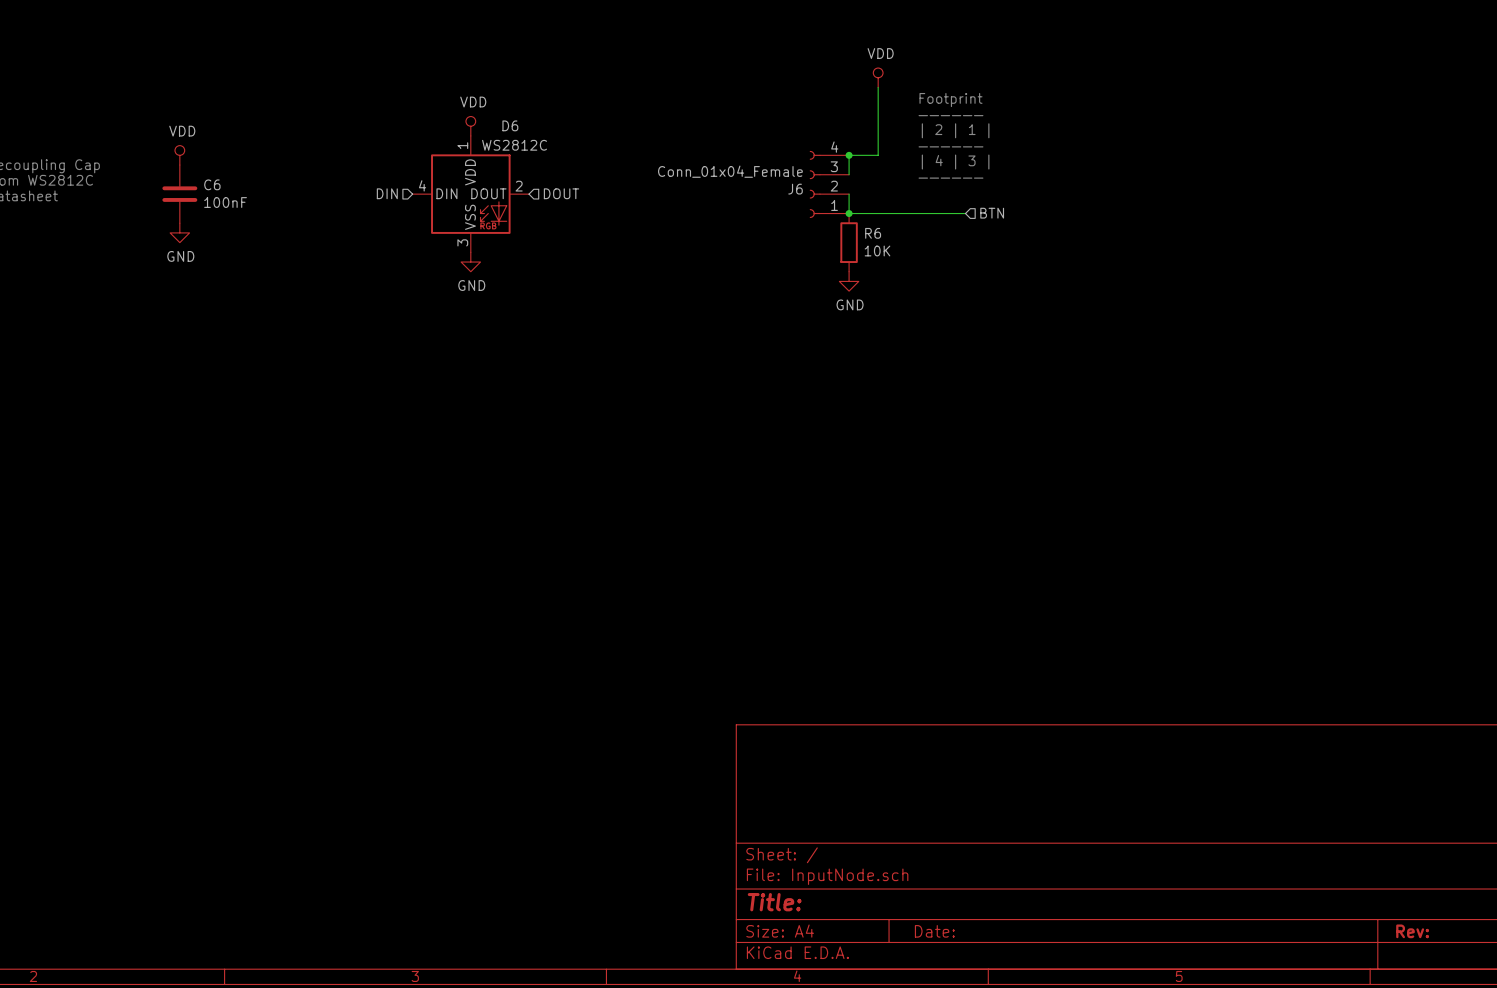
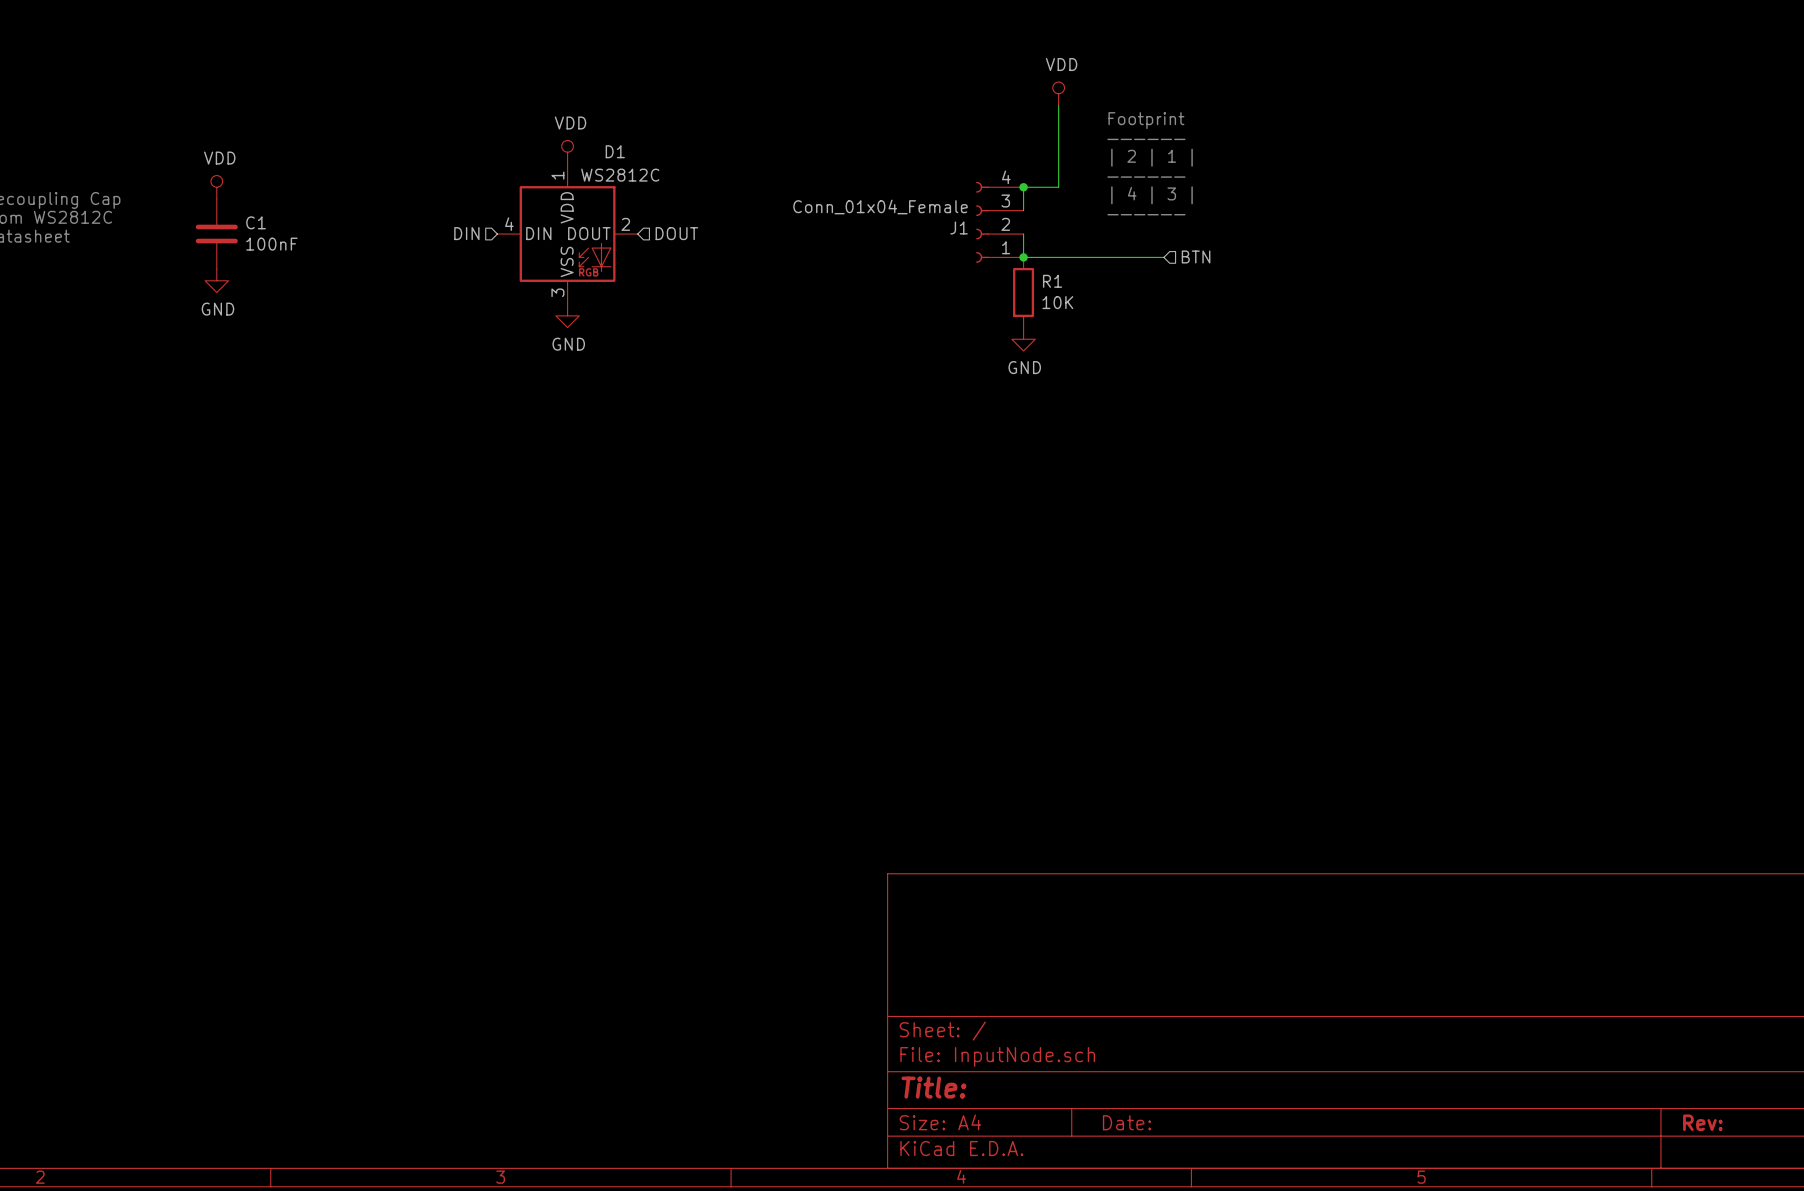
D6 name: D6 (510, 125) -> D1 (615, 151)
C6 name: C6 (212, 184) -> C1 (256, 222)
J6 name: J6 (795, 189) -> J1 (959, 227)
R6 name: R6 (873, 233) -> R1 (1052, 281)

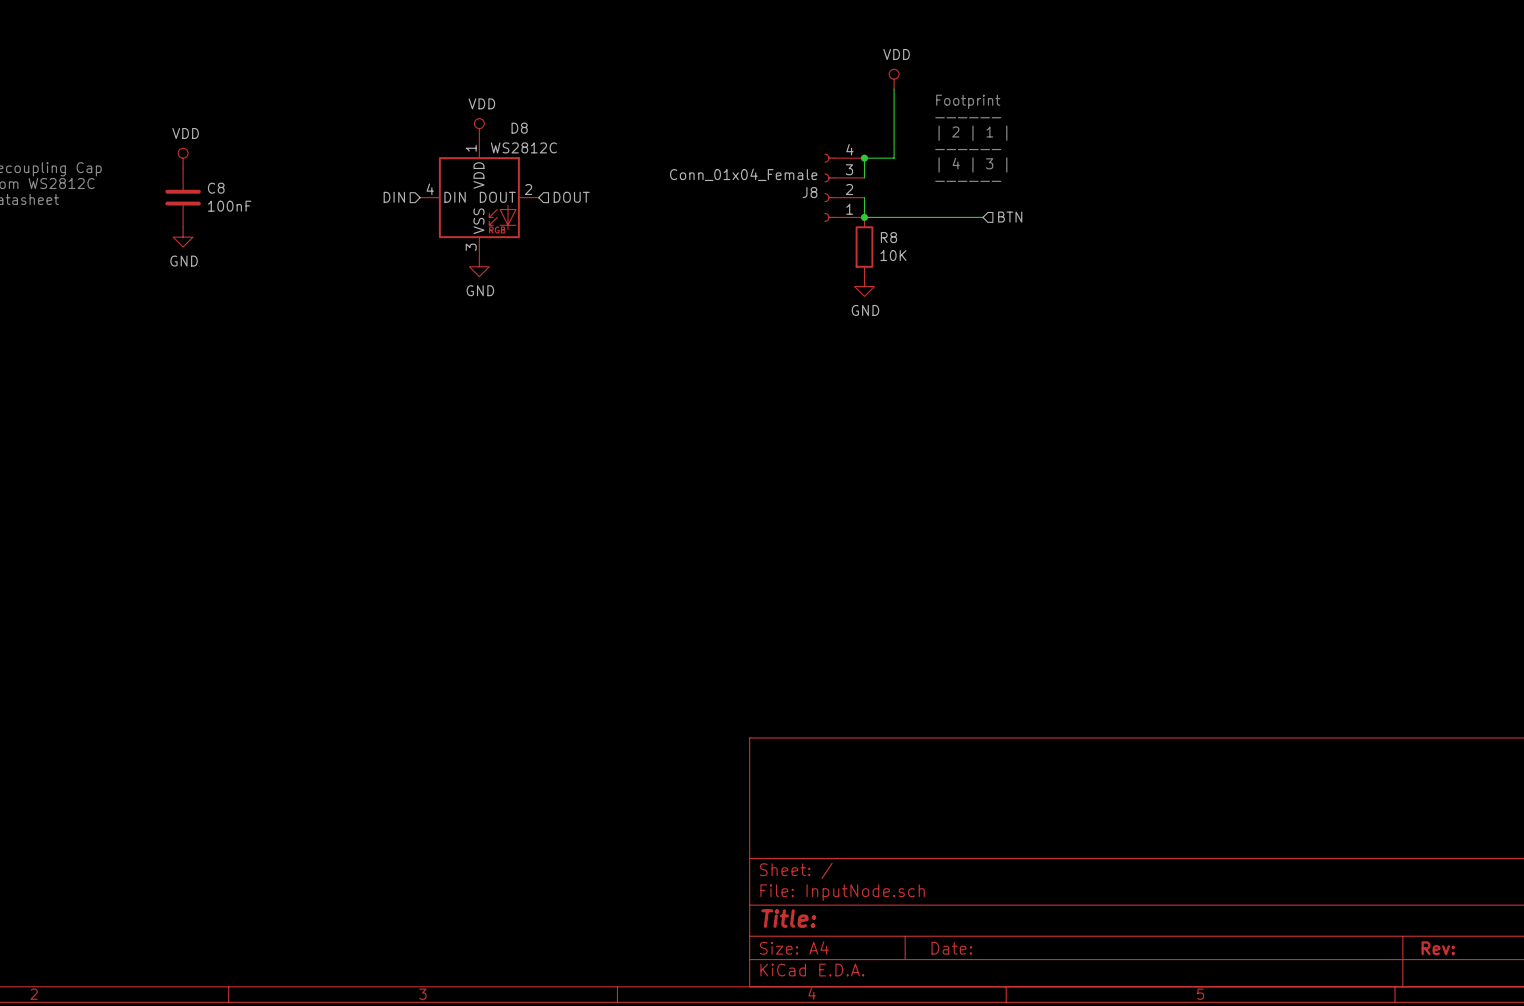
D1 name: D1 (615, 151) -> D8 (519, 128)
C1 name: C1 (256, 222) -> C8 (216, 188)
J1 name: J1 (959, 227) -> J8 (809, 192)
R1 name: R1 (1052, 281) -> R8 (888, 237)

